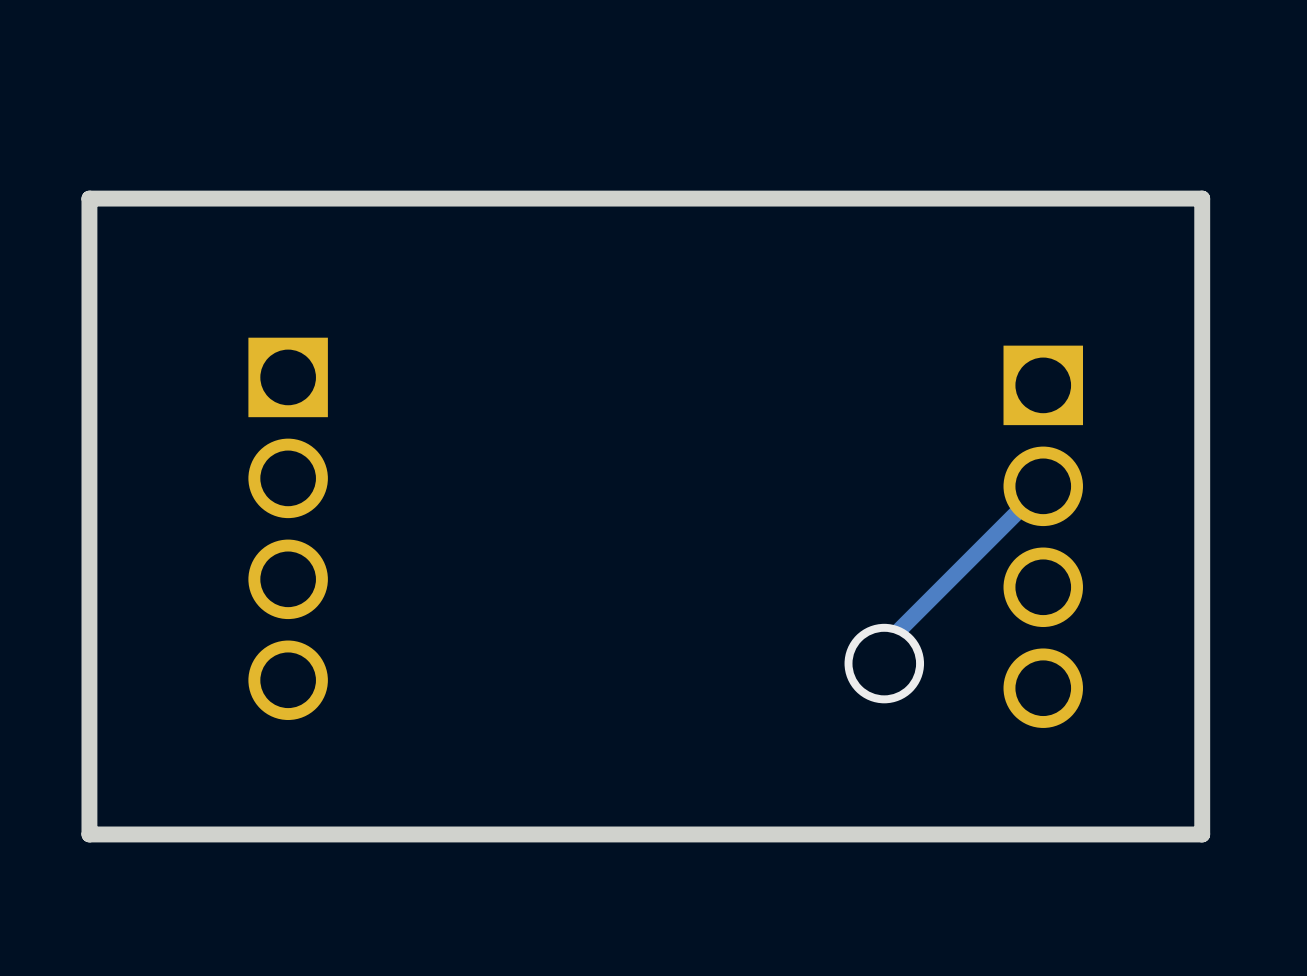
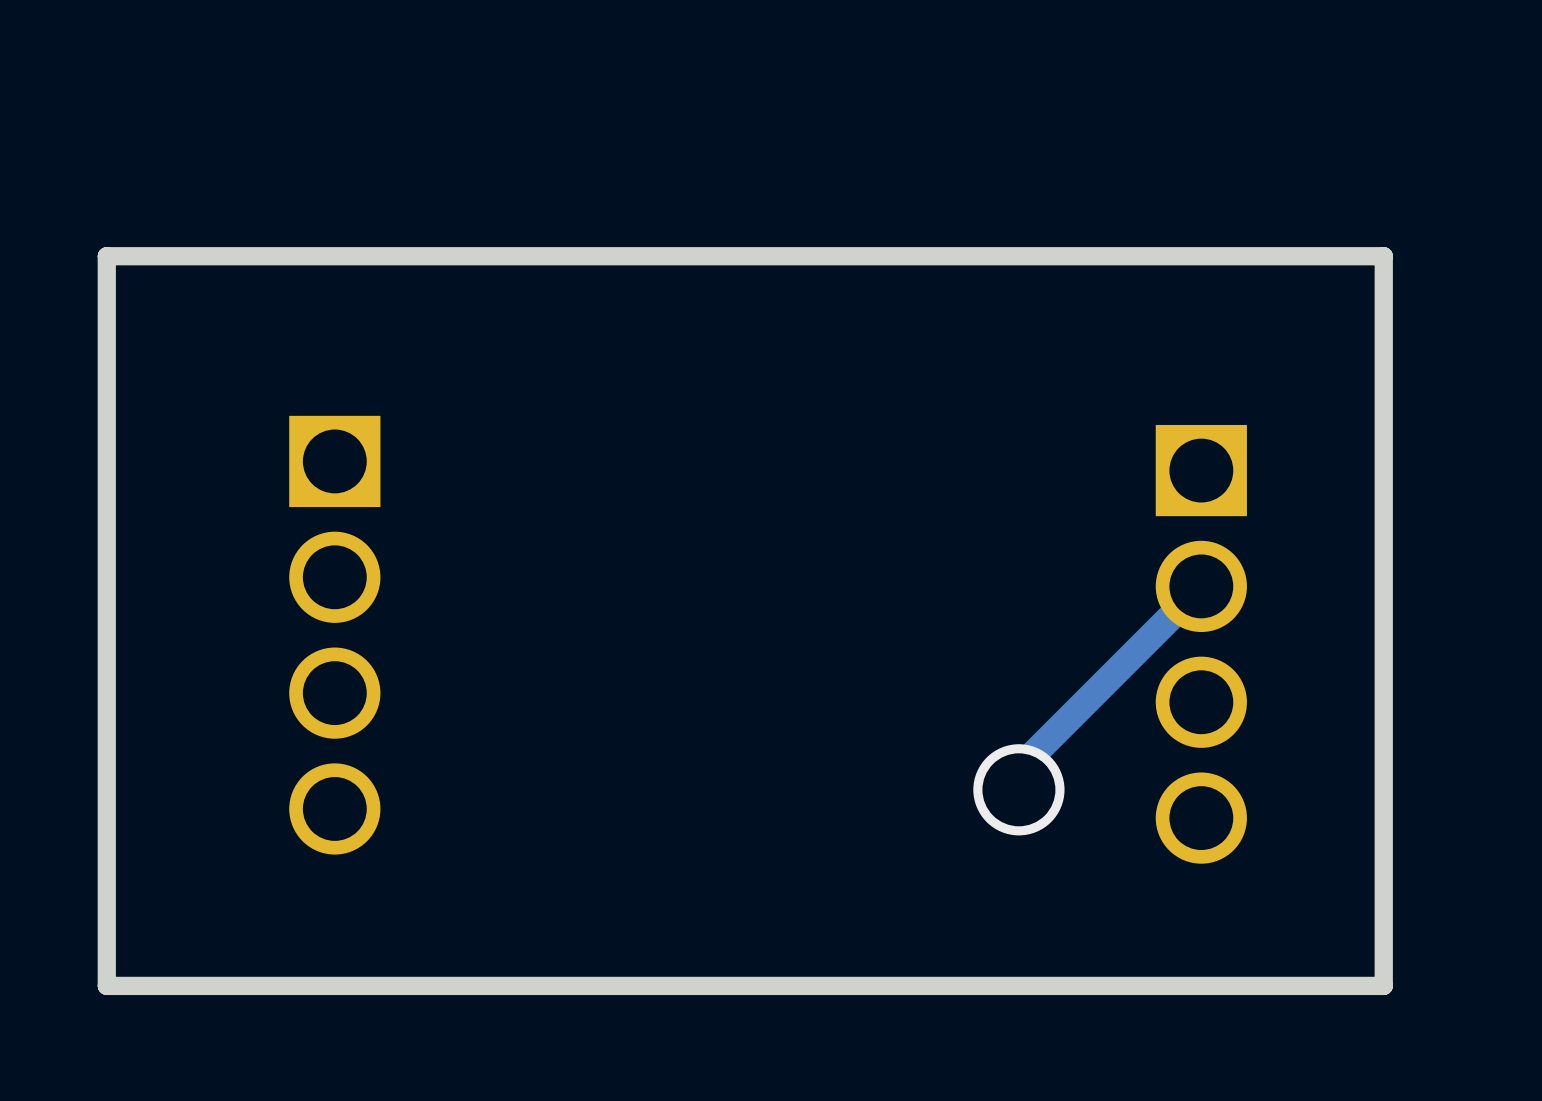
track width: thin (1043, 486) (884, 645) -> thick (1201, 586) (1018, 768)

